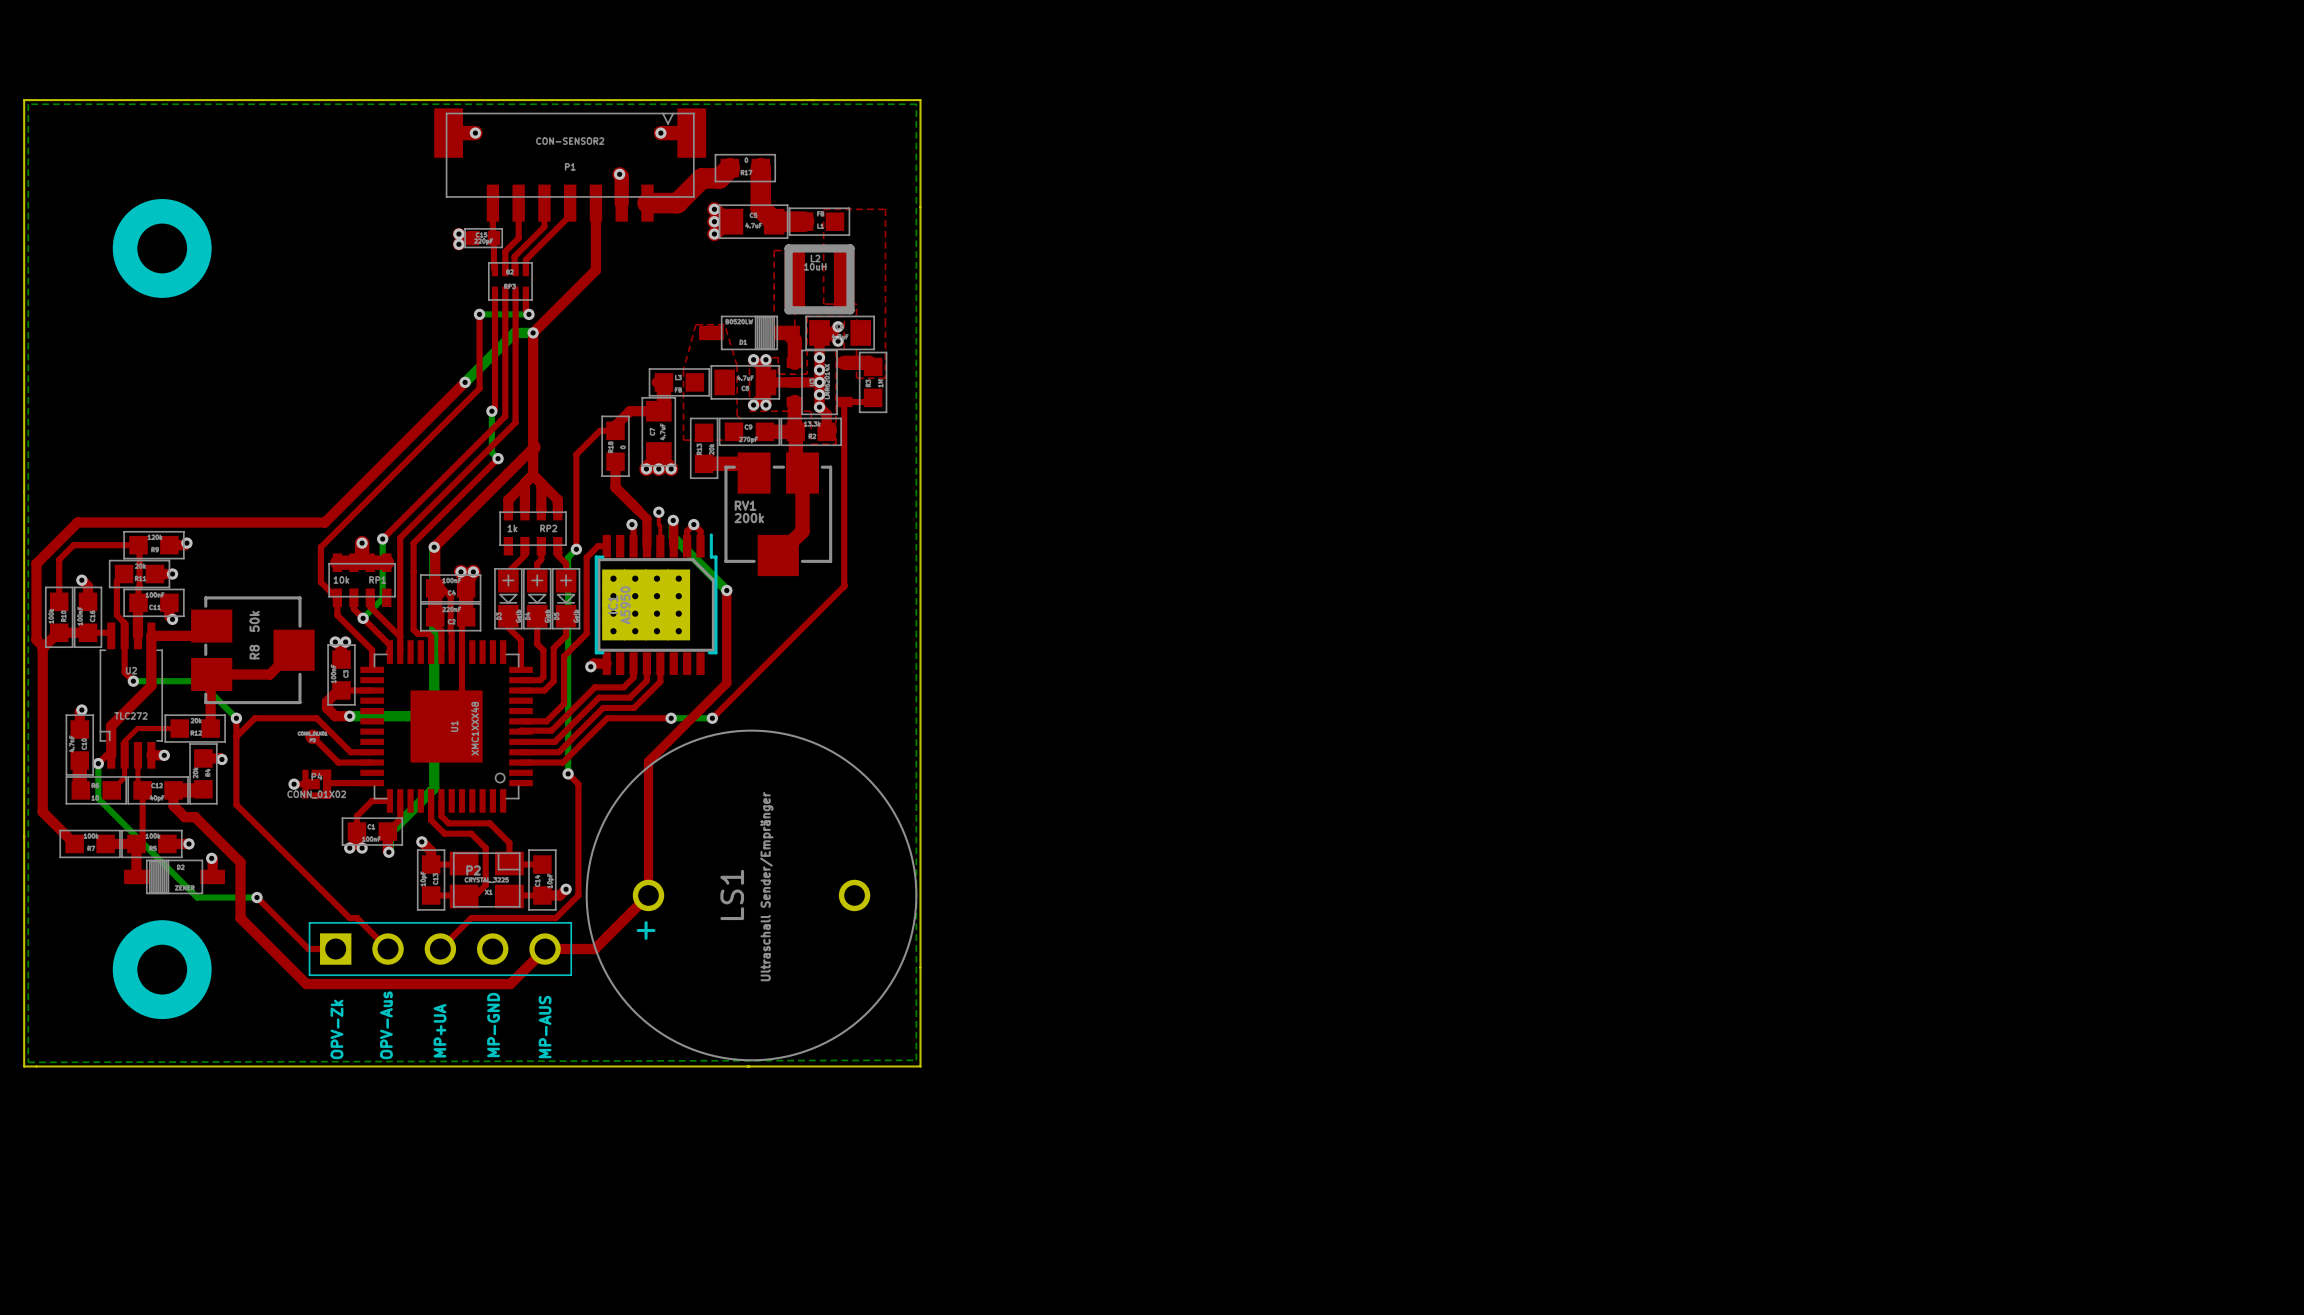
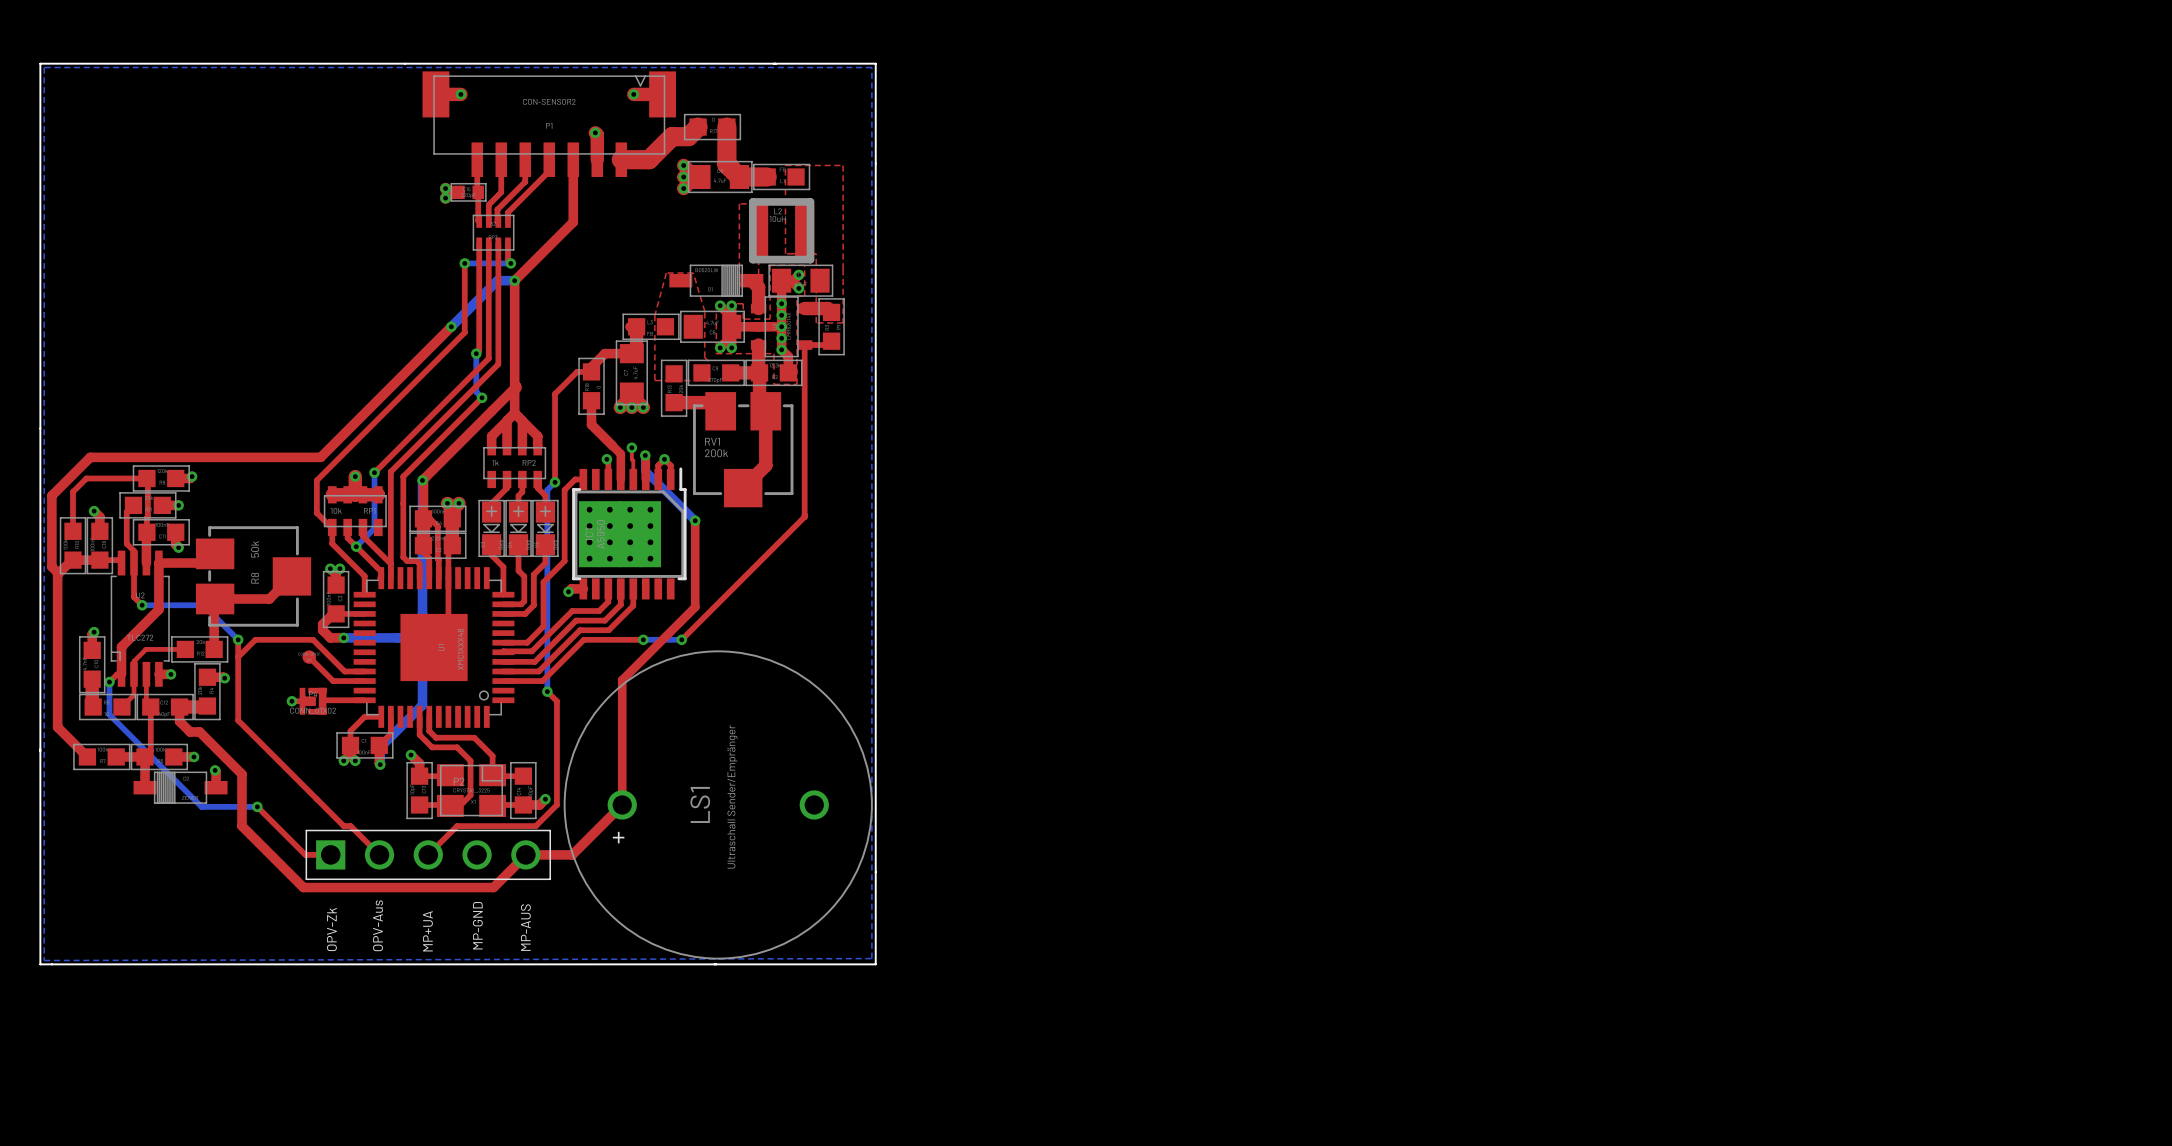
part: (162, 248) -> none
part: (162, 969) -> none

